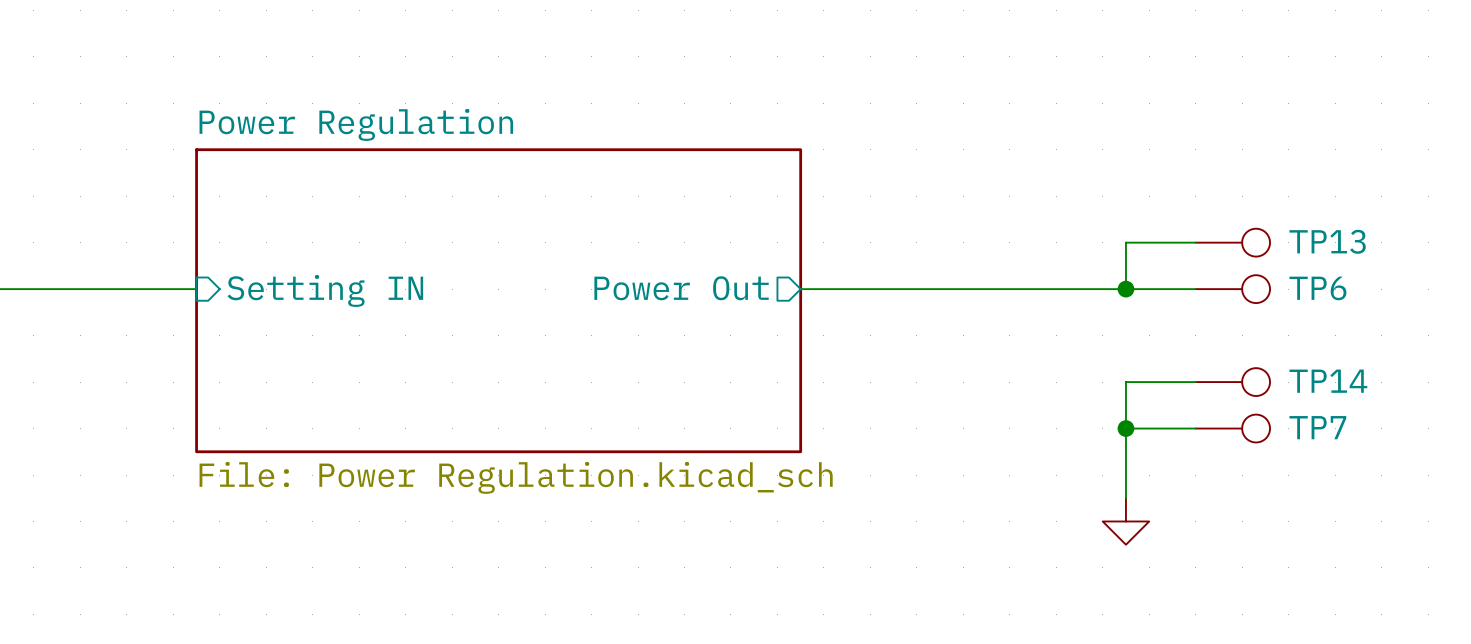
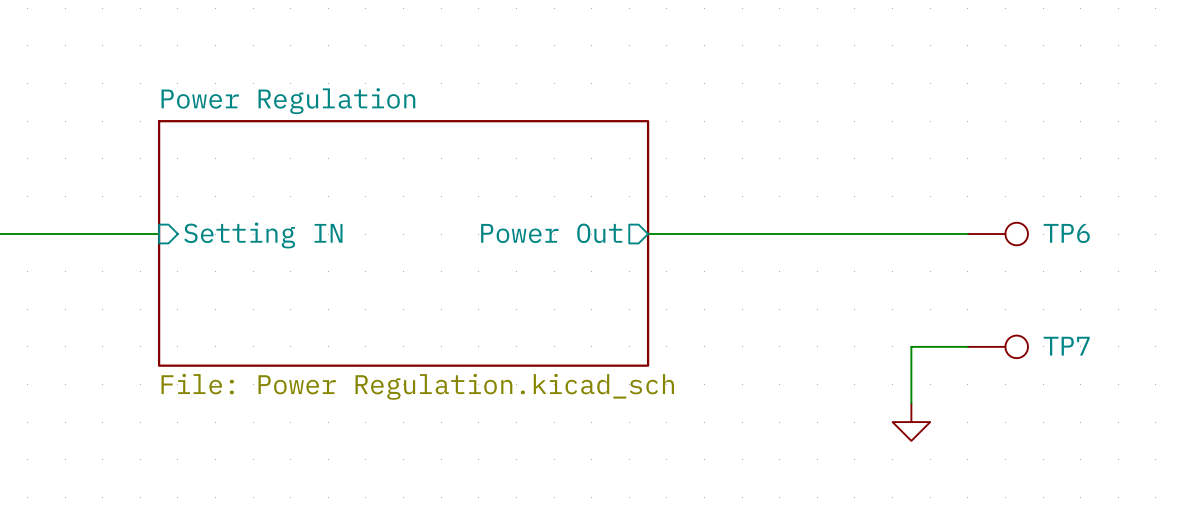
wire: (1195, 242) (1125, 242) (1125, 289) -> none
TP13: (1232, 242) -> none
junction: (1125, 289) -> none
wire: (1195, 382) (1125, 382) (1125, 428) -> none
TP14: (1232, 382) -> none
junction: (1125, 428) -> none

